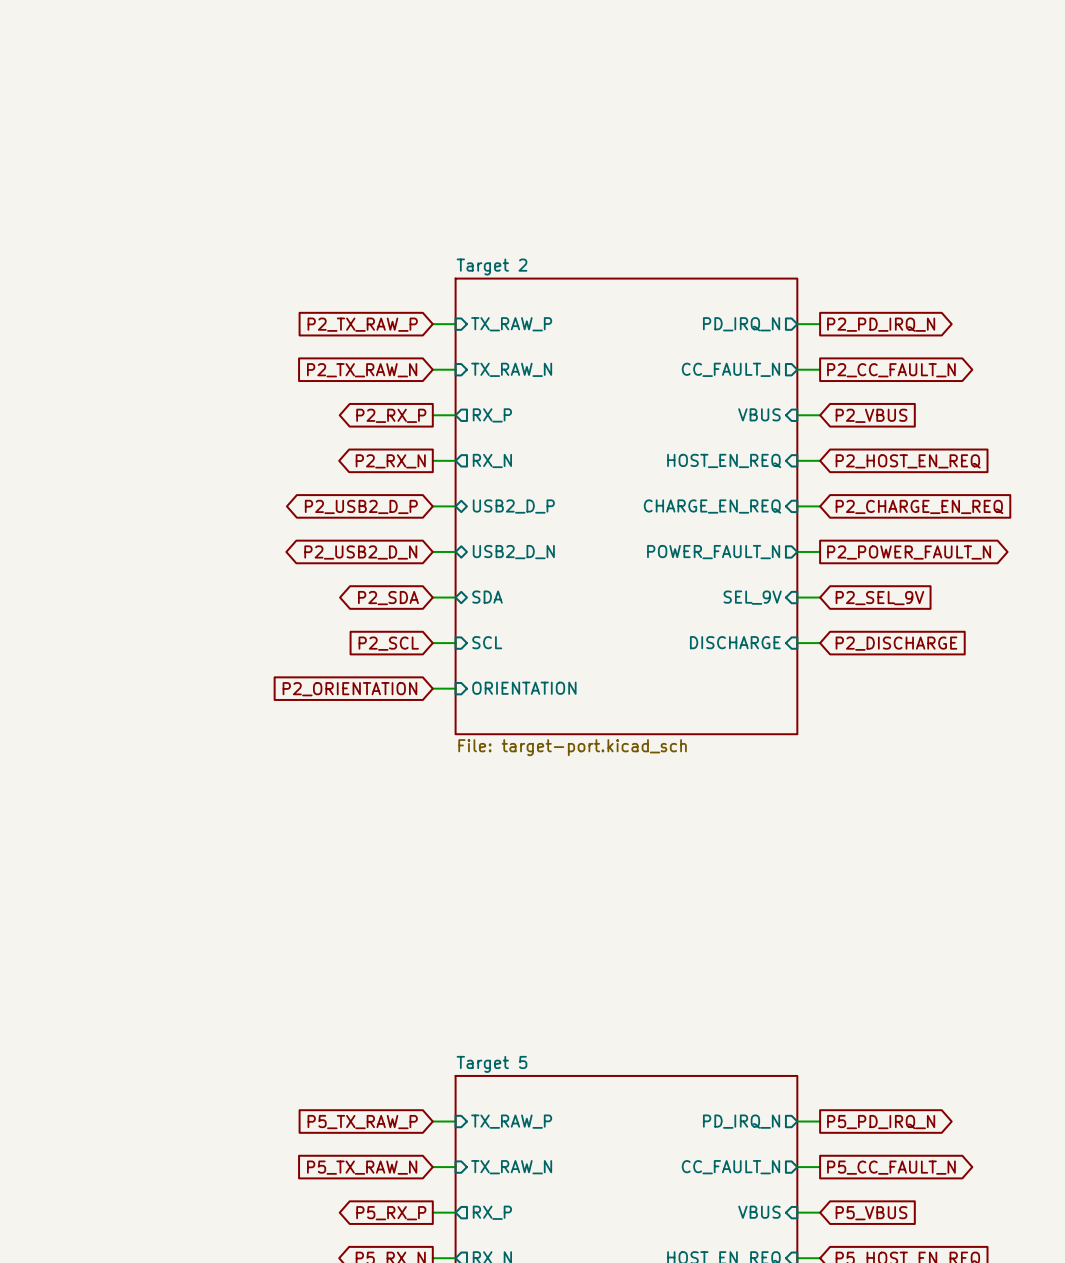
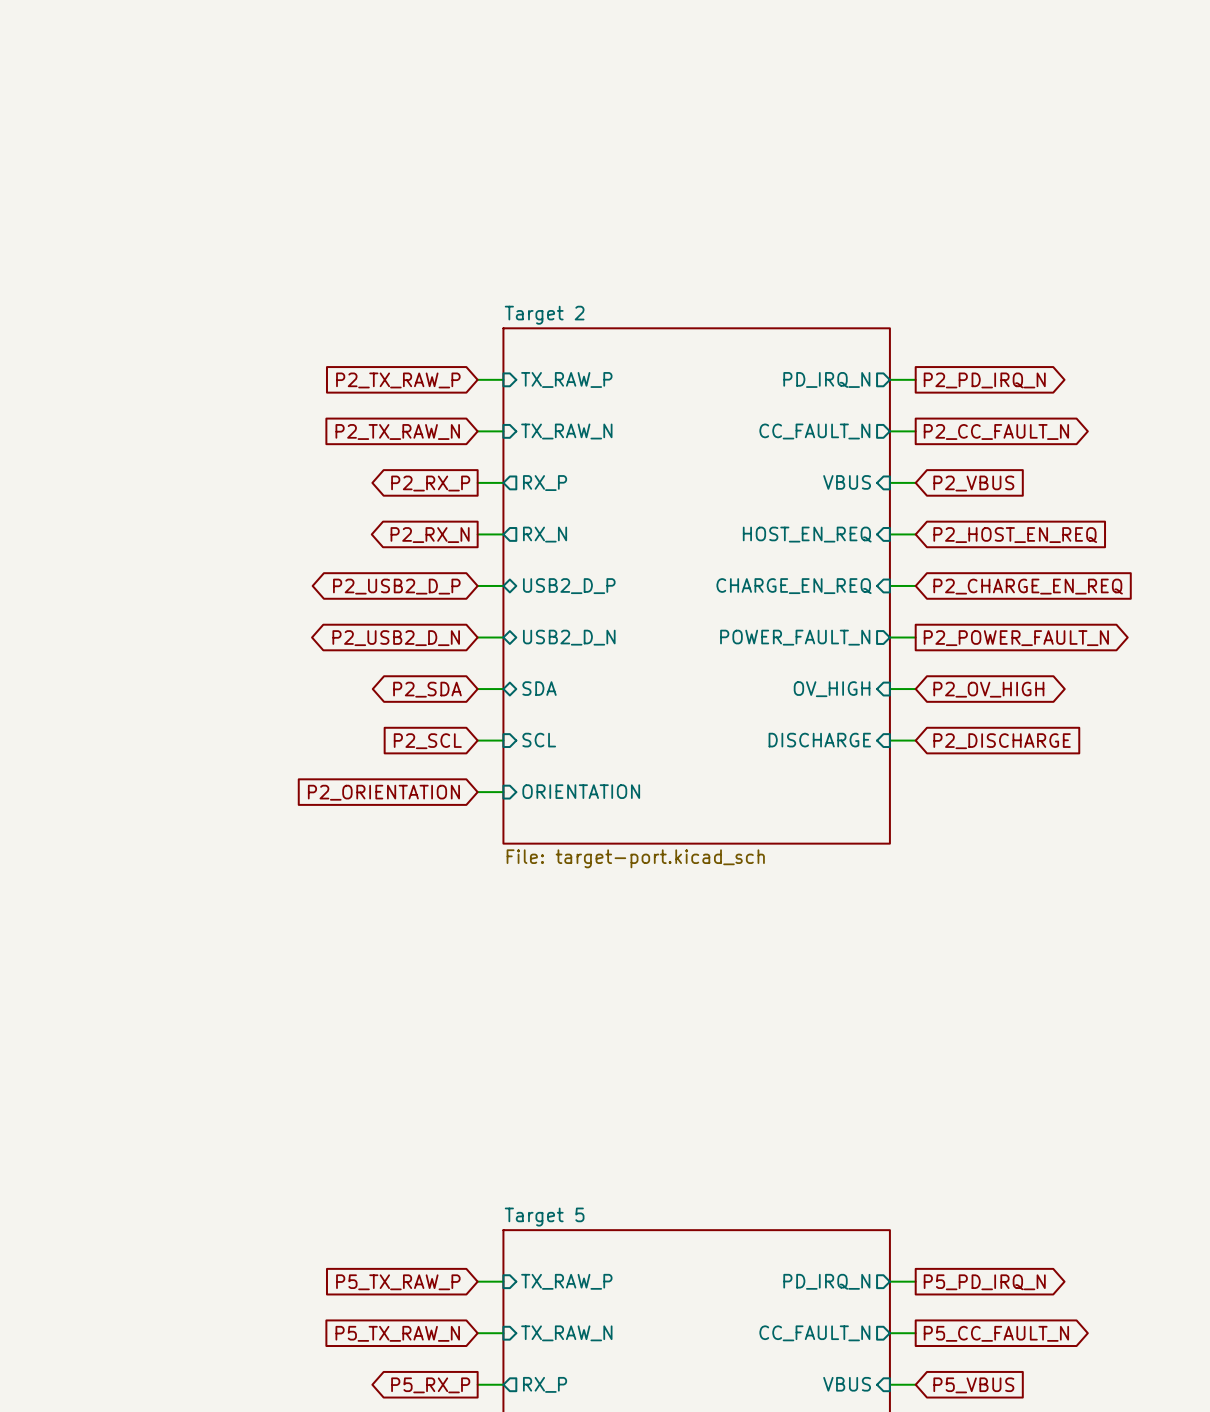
sheet pin: SEL_9V (752, 597) -> OV_HIGH (832, 689)
global label shape: input (879, 598) -> bidirectional (988, 689)
global label: P2_SEL_9V (879, 598) -> P2_OV_HIGH (988, 689)

